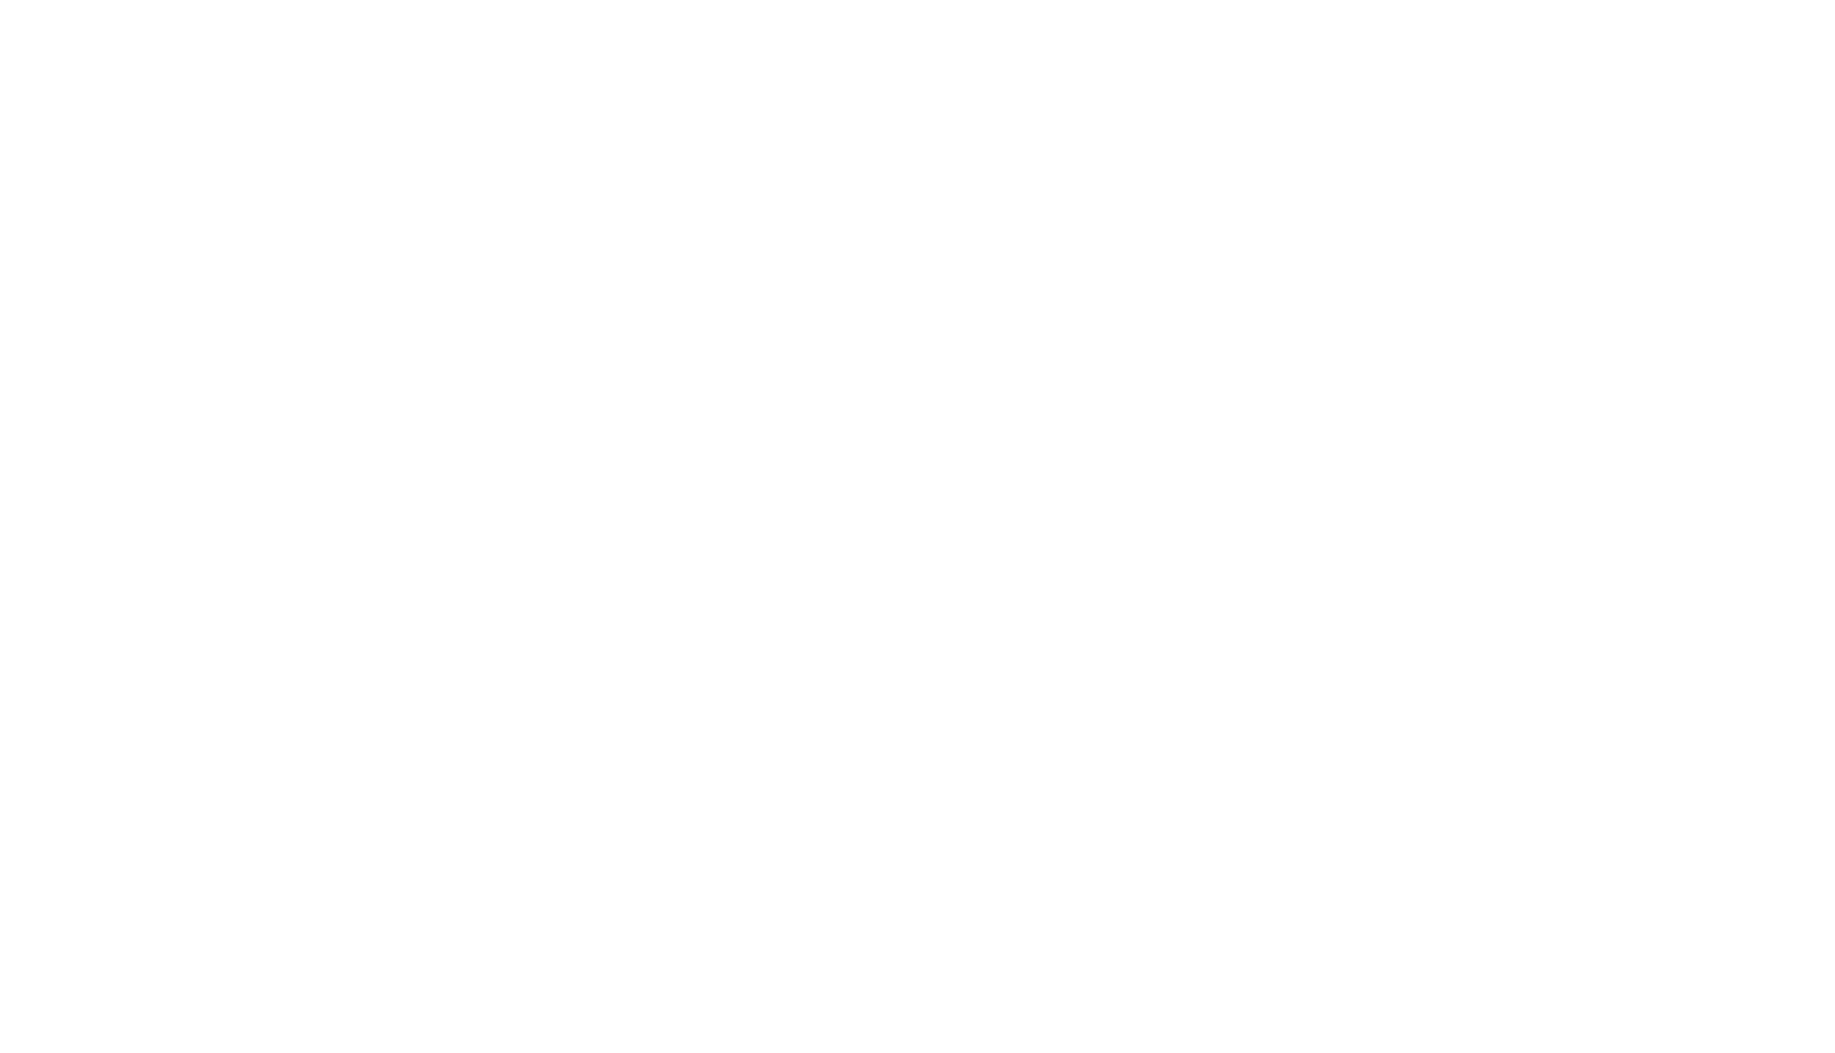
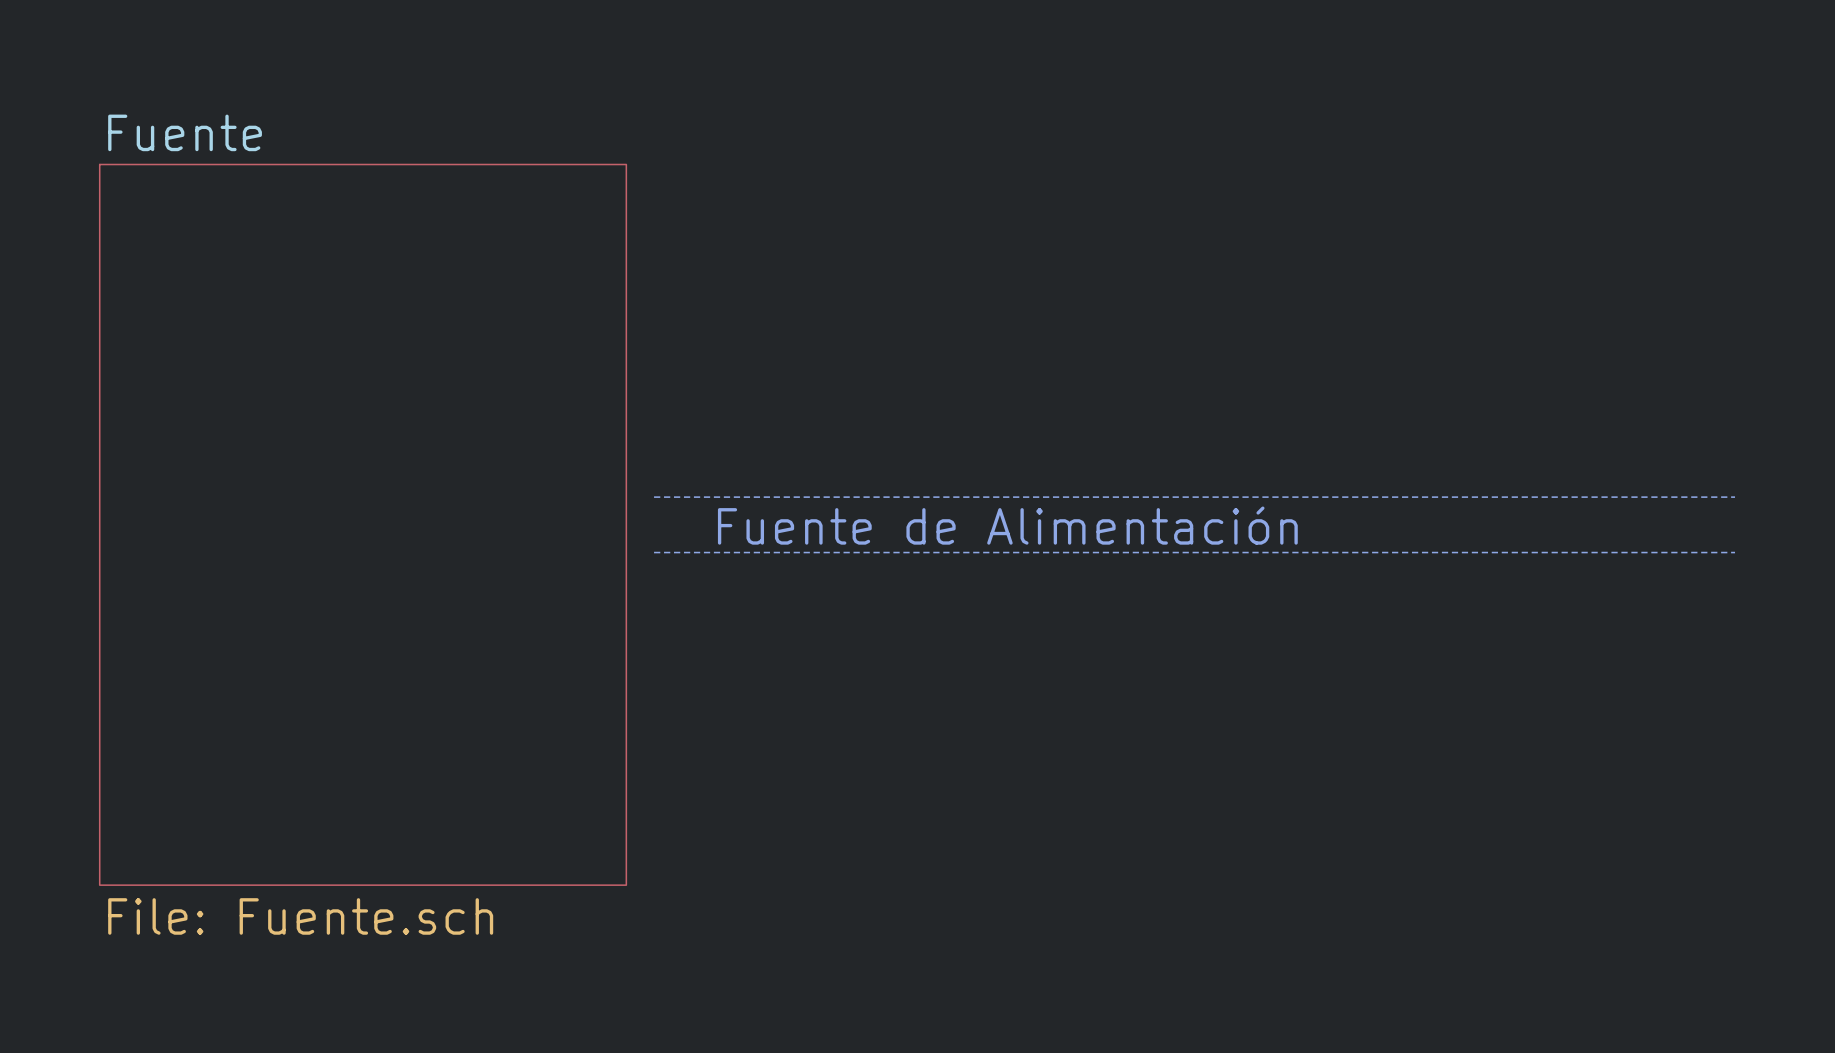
line: none -> (654, 497) (1735, 497)
sheet Fuente: none -> File: Fuente.sch (363, 524)
text: none -> Fuente de Alimentación (1007, 525)
line: none -> (654, 552) (1735, 552)

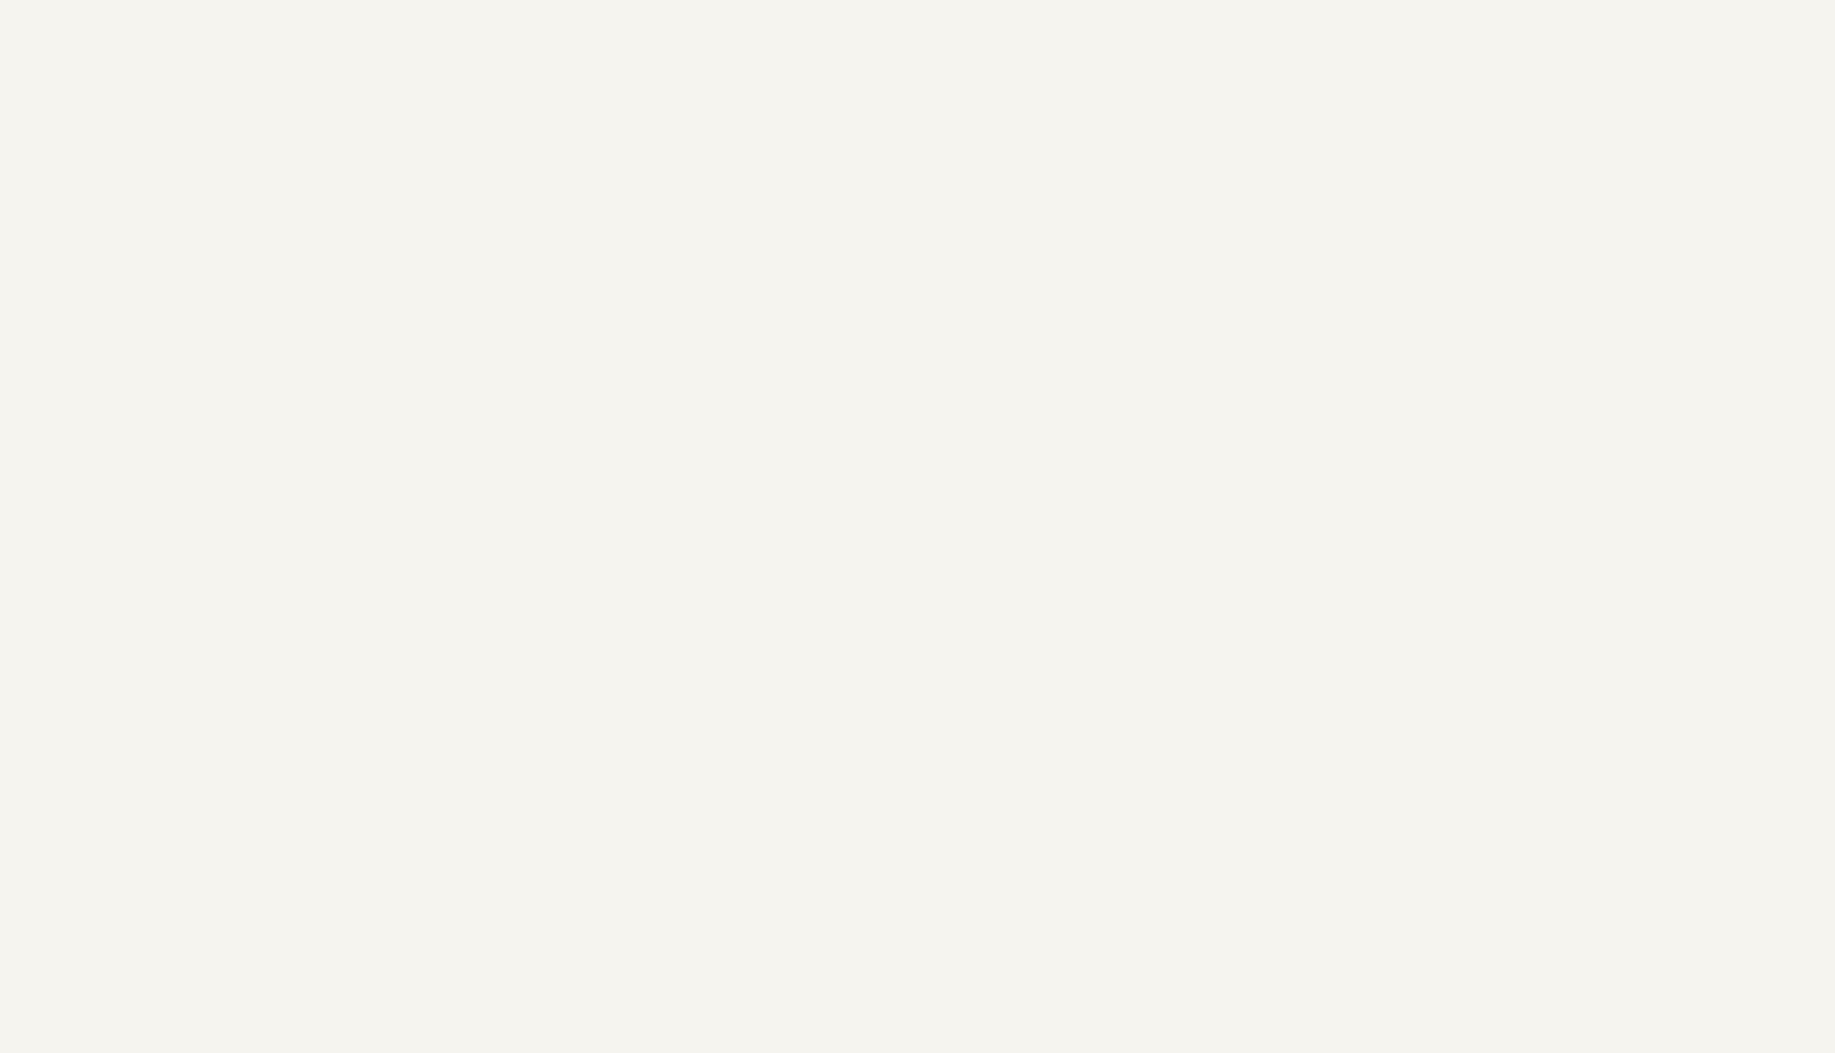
line: (654, 497) (1735, 497) -> none
sheet Fuente: File: Fuente.sch (363, 524) -> none
text: Fuente de Alimentación (1007, 525) -> none
line: (654, 552) (1735, 552) -> none

